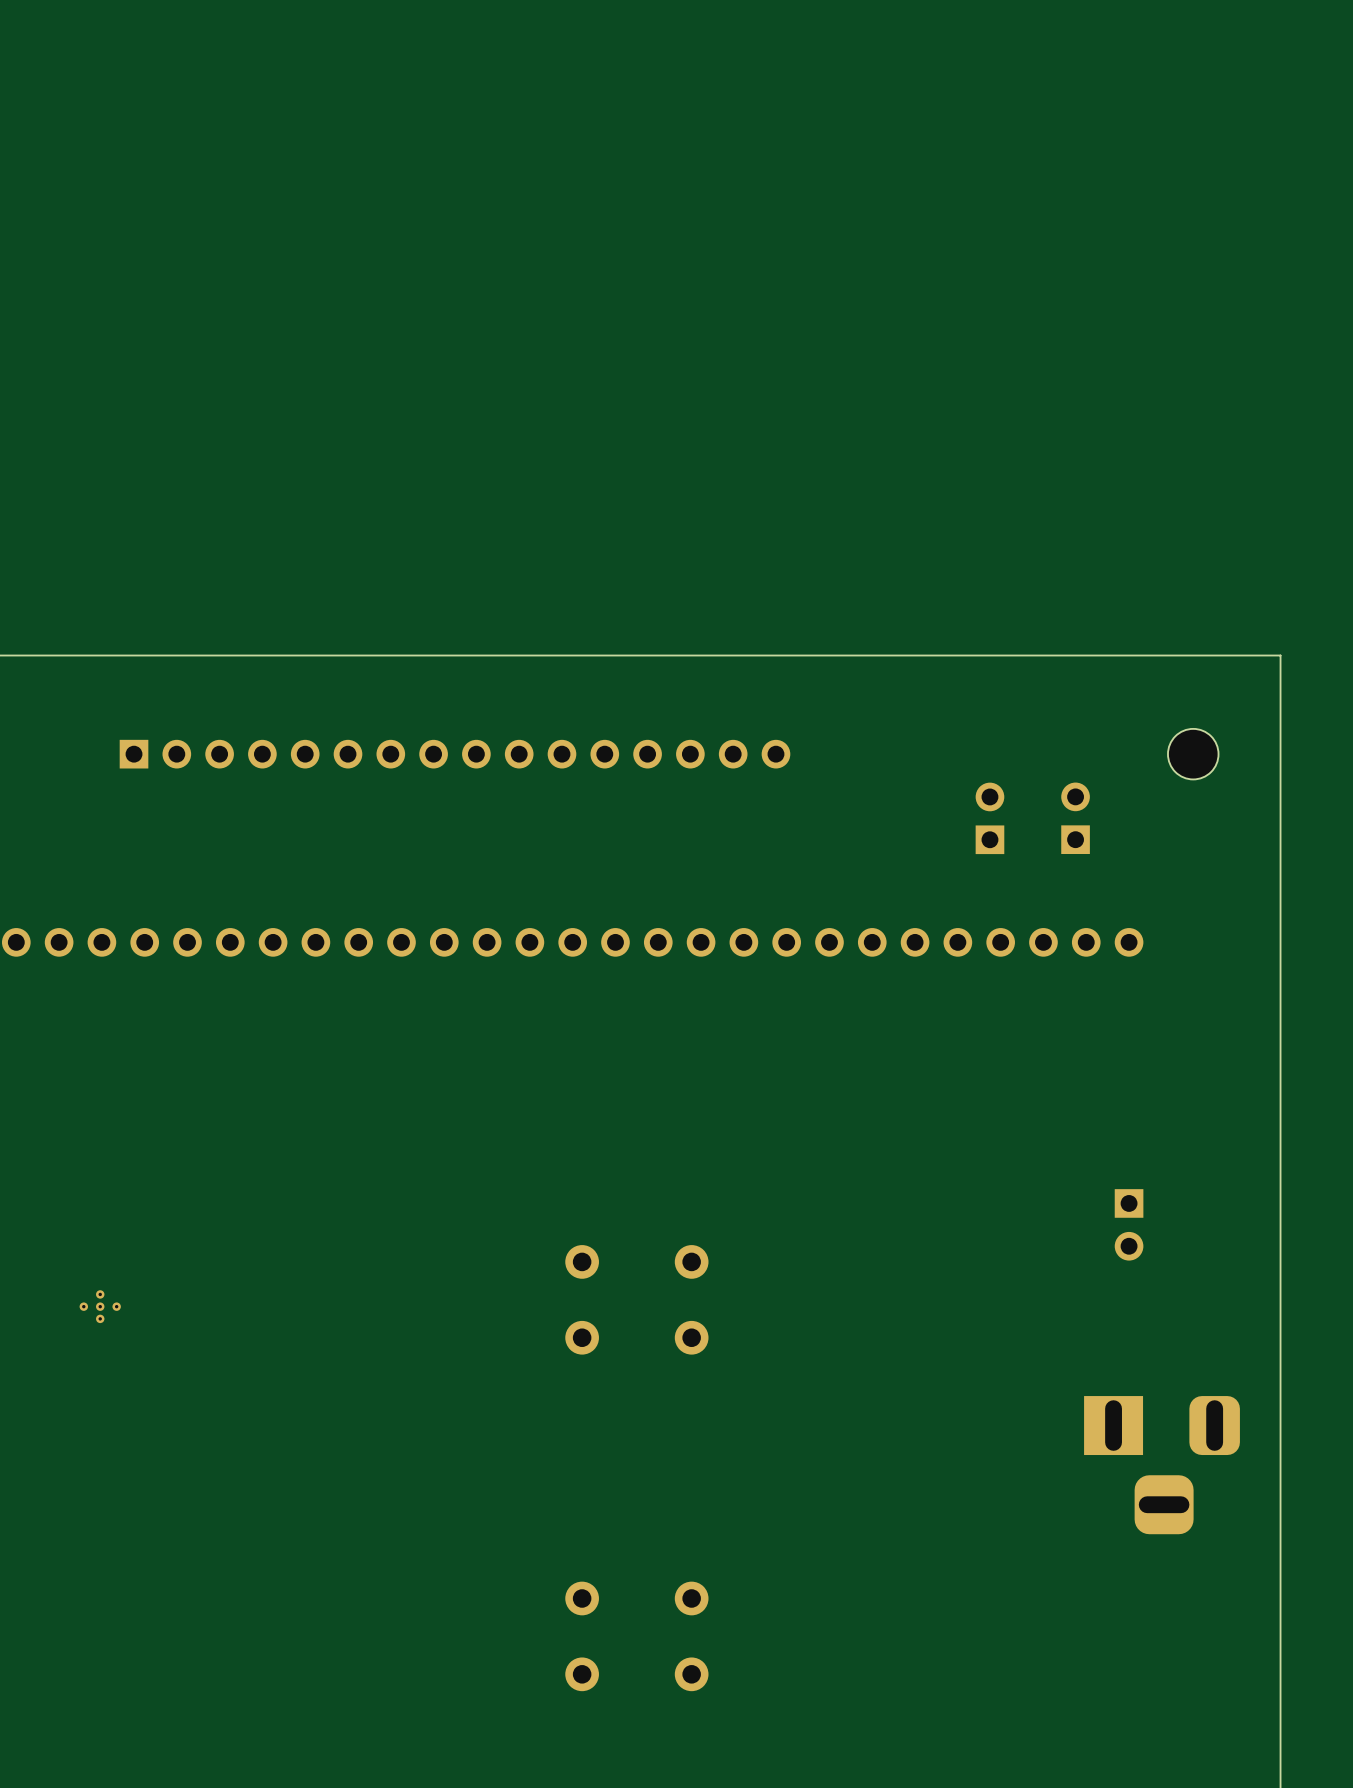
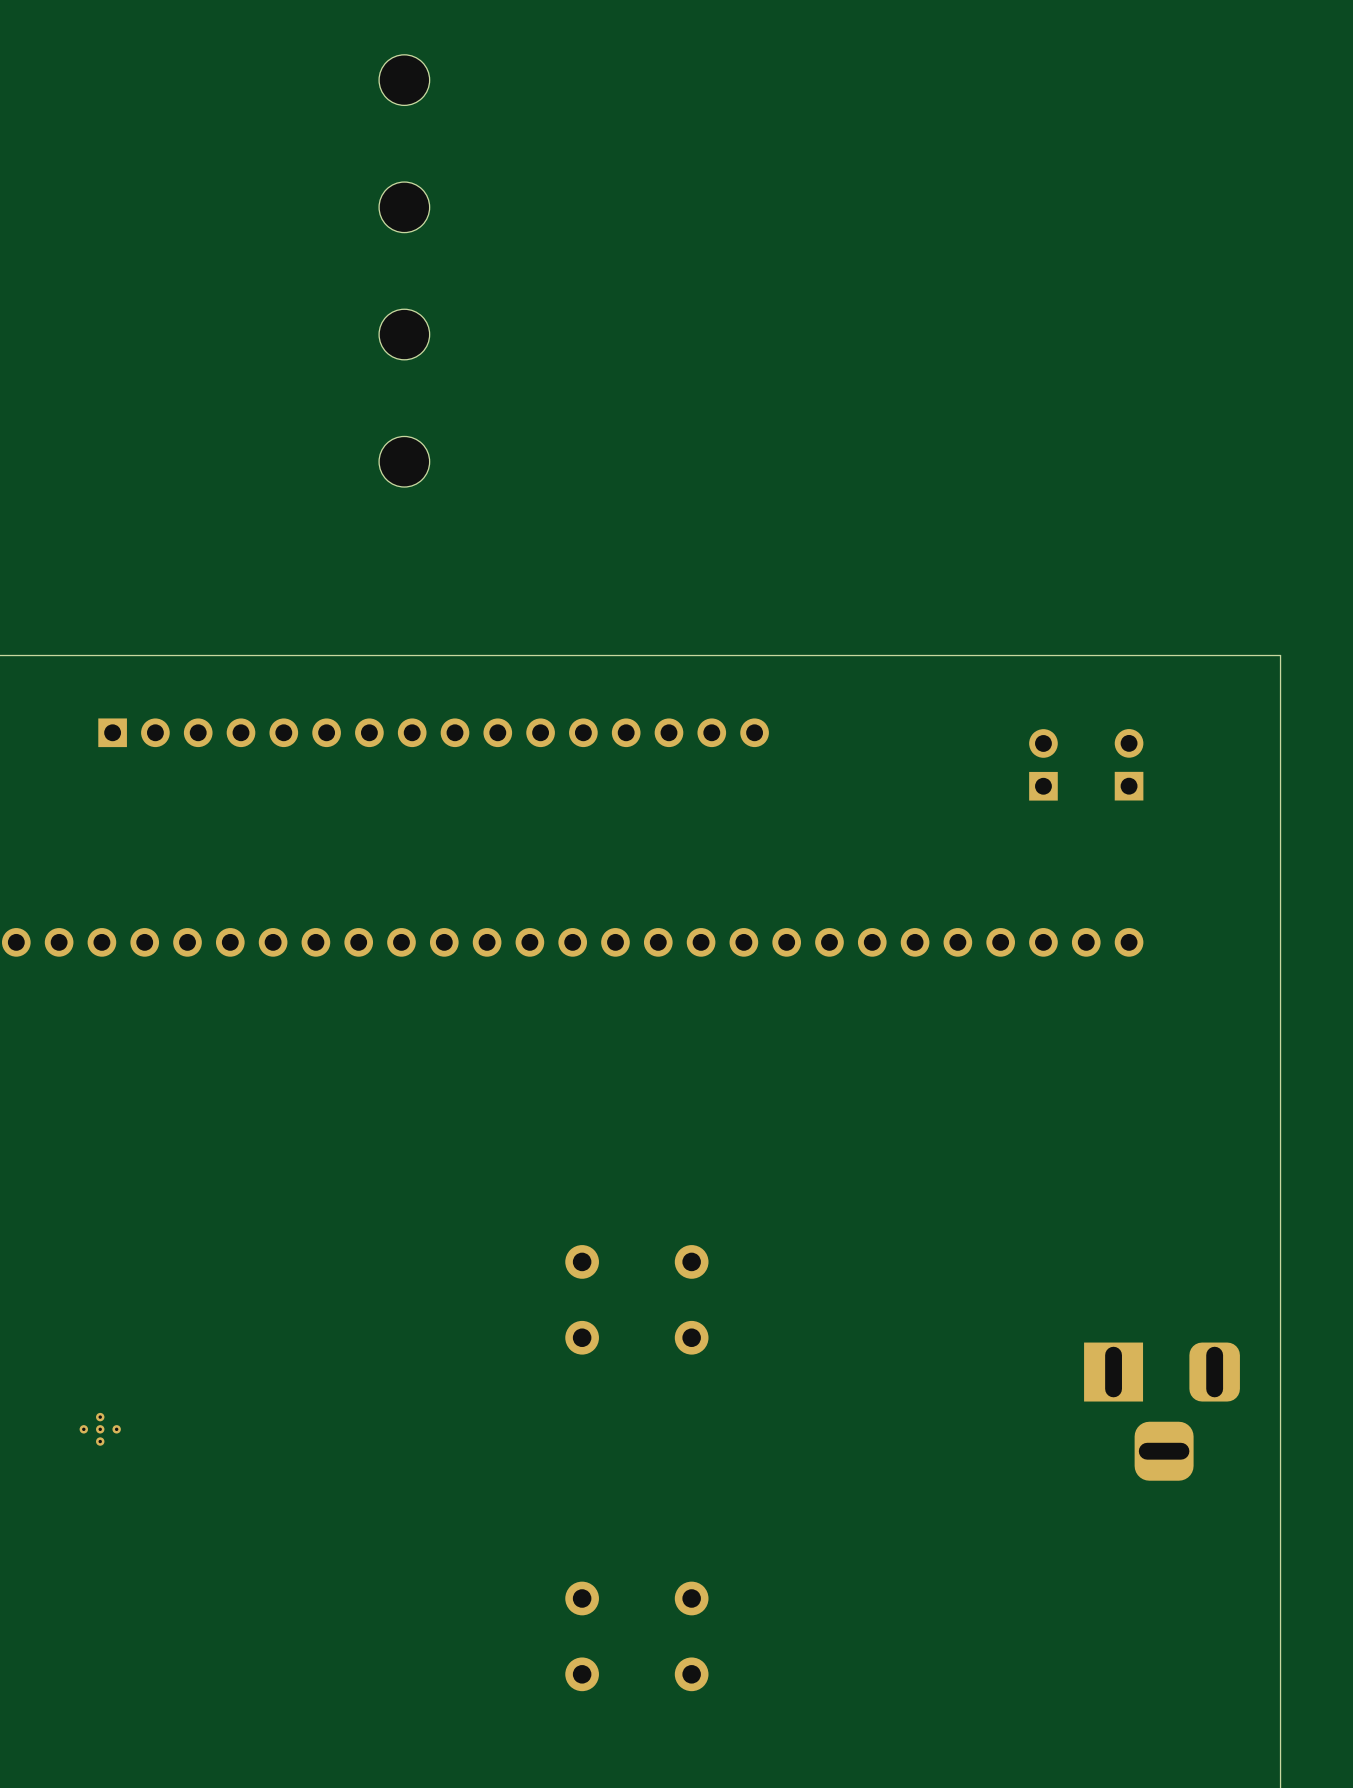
part: none -> (404, 80)
part: none -> (404, 207)
part: none -> (404, 334)
part: none -> (404, 461)
part position: (454, 754) -> (433, 732)
part: (1193, 754) -> none
part: none -> (1043, 764)
part: none -> (1129, 764)
part: (989, 818) -> none
part: (1075, 818) -> none
part: (1129, 1224) -> none
part position: (100, 1306) -> (100, 1429)
part position: (1162, 1465) -> (1162, 1411)

